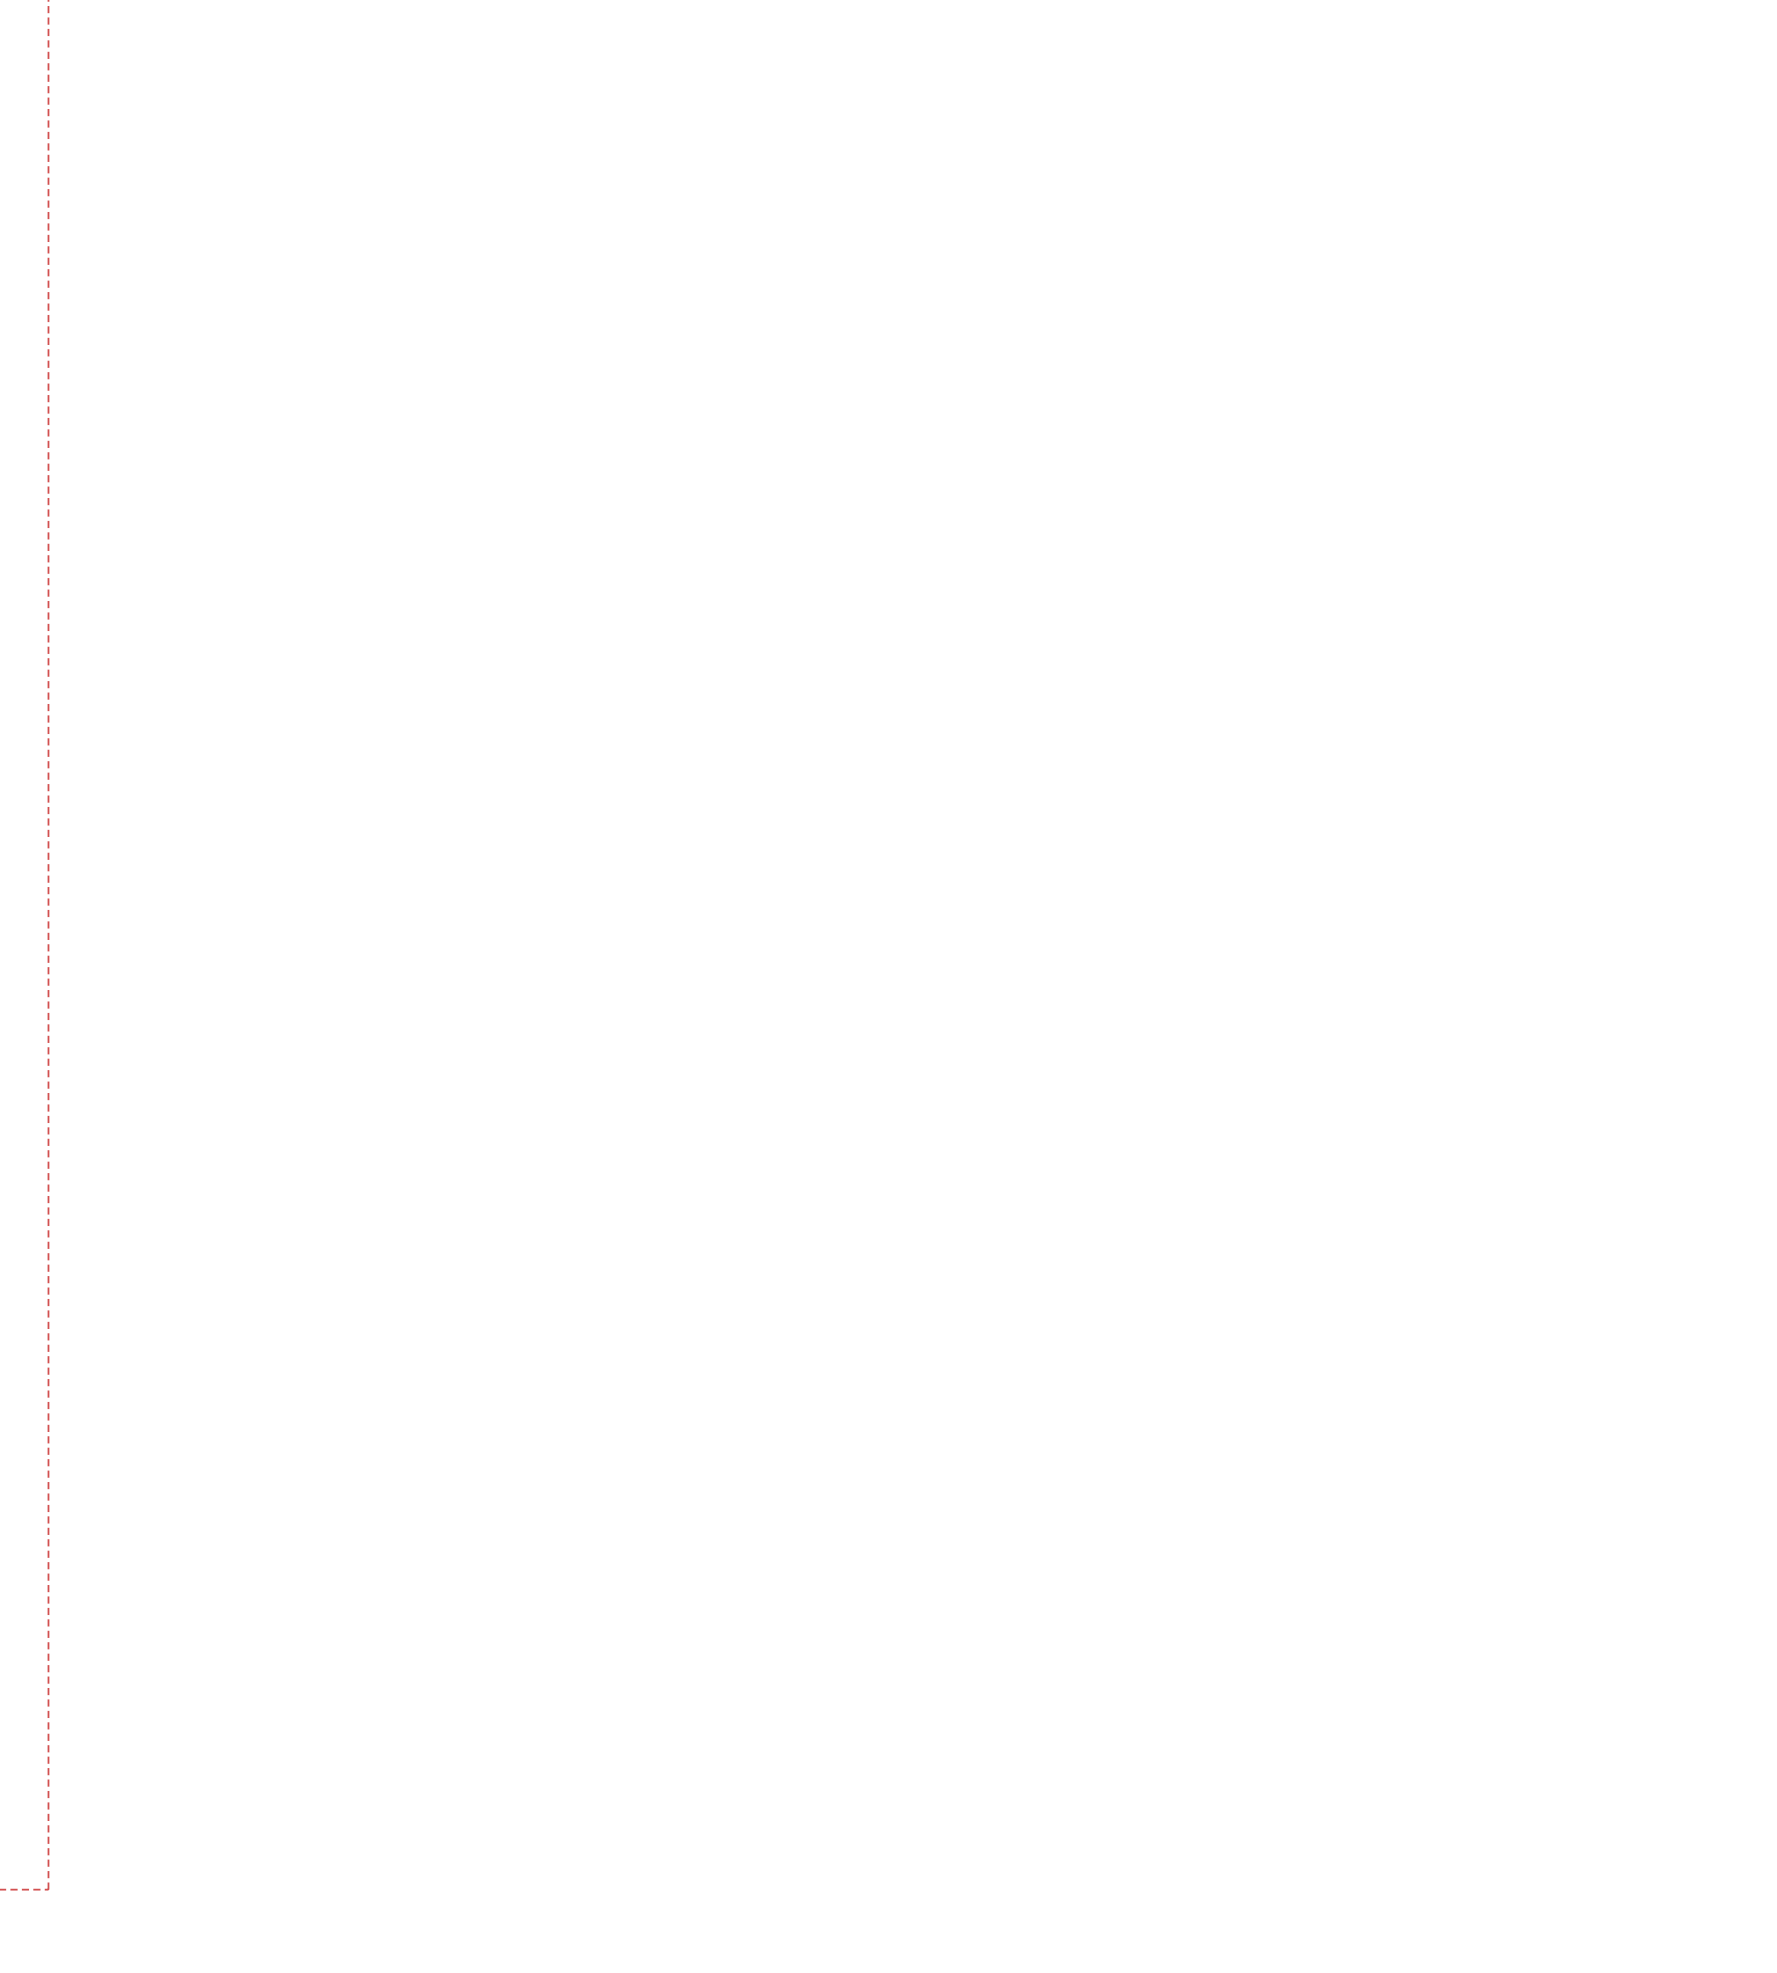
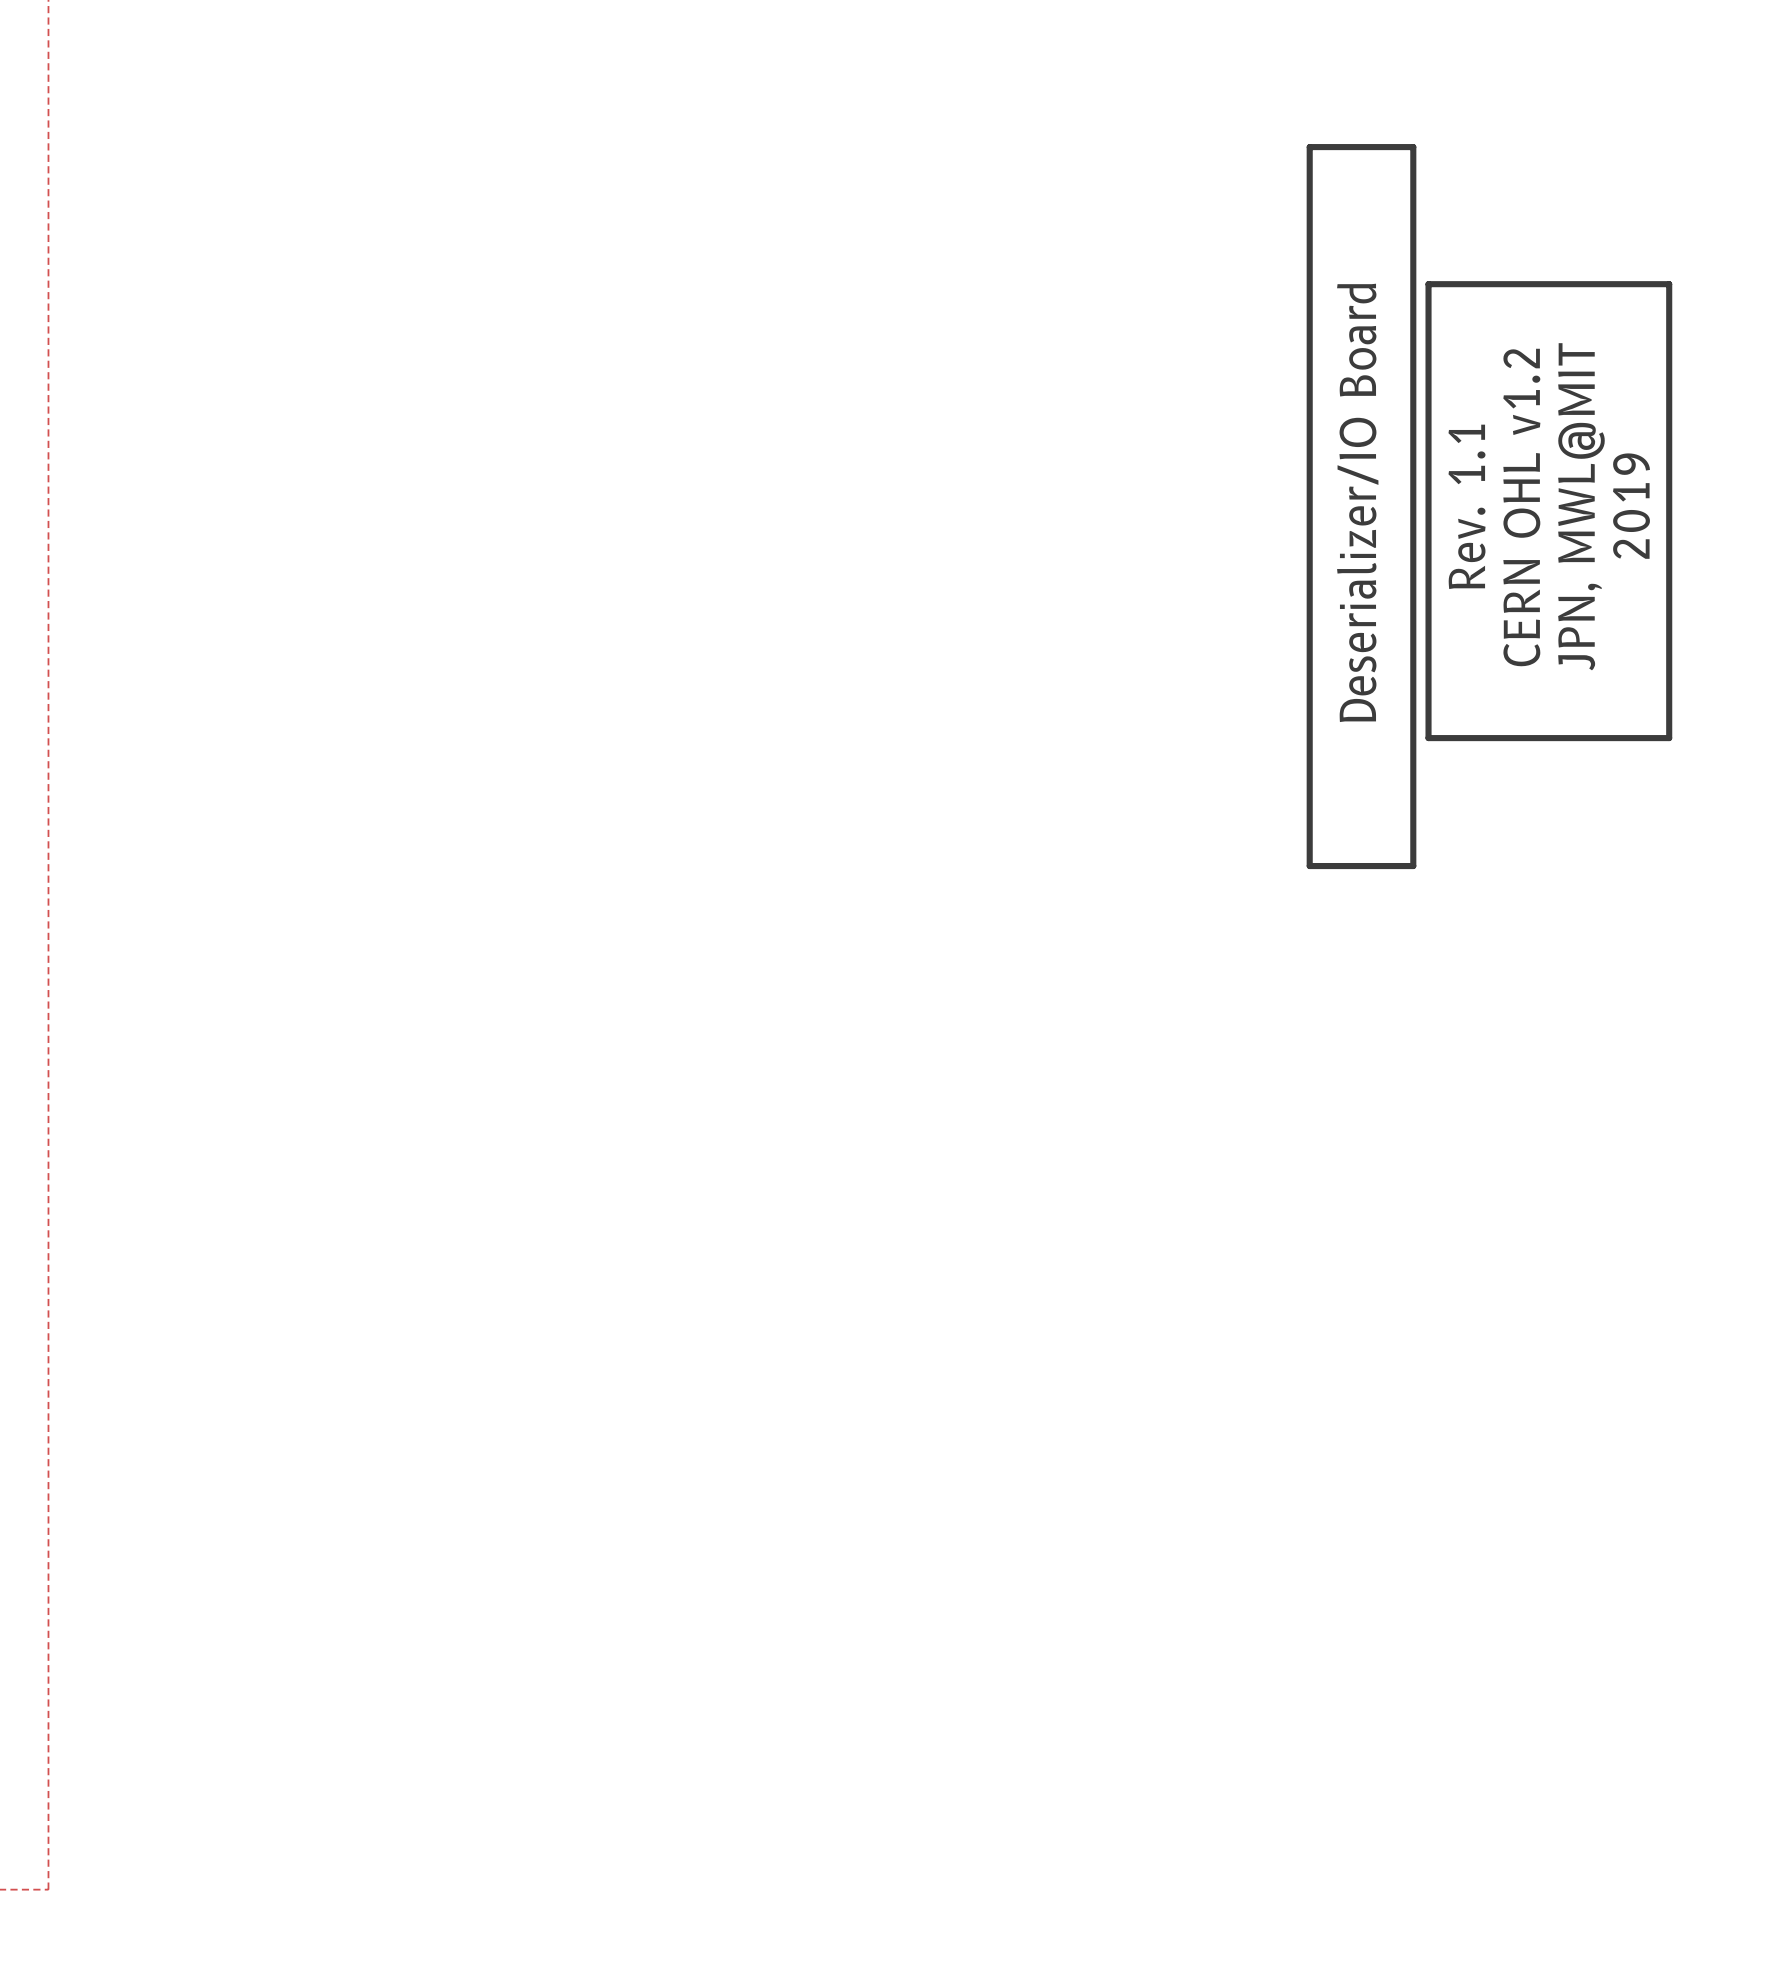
line: none -> (1309, 147) (1309, 866) (1413, 866) (1413, 147) (1309, 147)
line: none -> (1428, 284) (1428, 738) (1669, 738) (1669, 284) (1428, 284)
text: none -> Deserializer/IO Board (1357, 502)
text: none -> Rev. 1.1 (1467, 506)
text: none -> JPN, MWL@MIT (1581, 506)
text: none -> 2019 (1631, 506)
text: none -> CERN OHL v1.2 (1521, 507)

